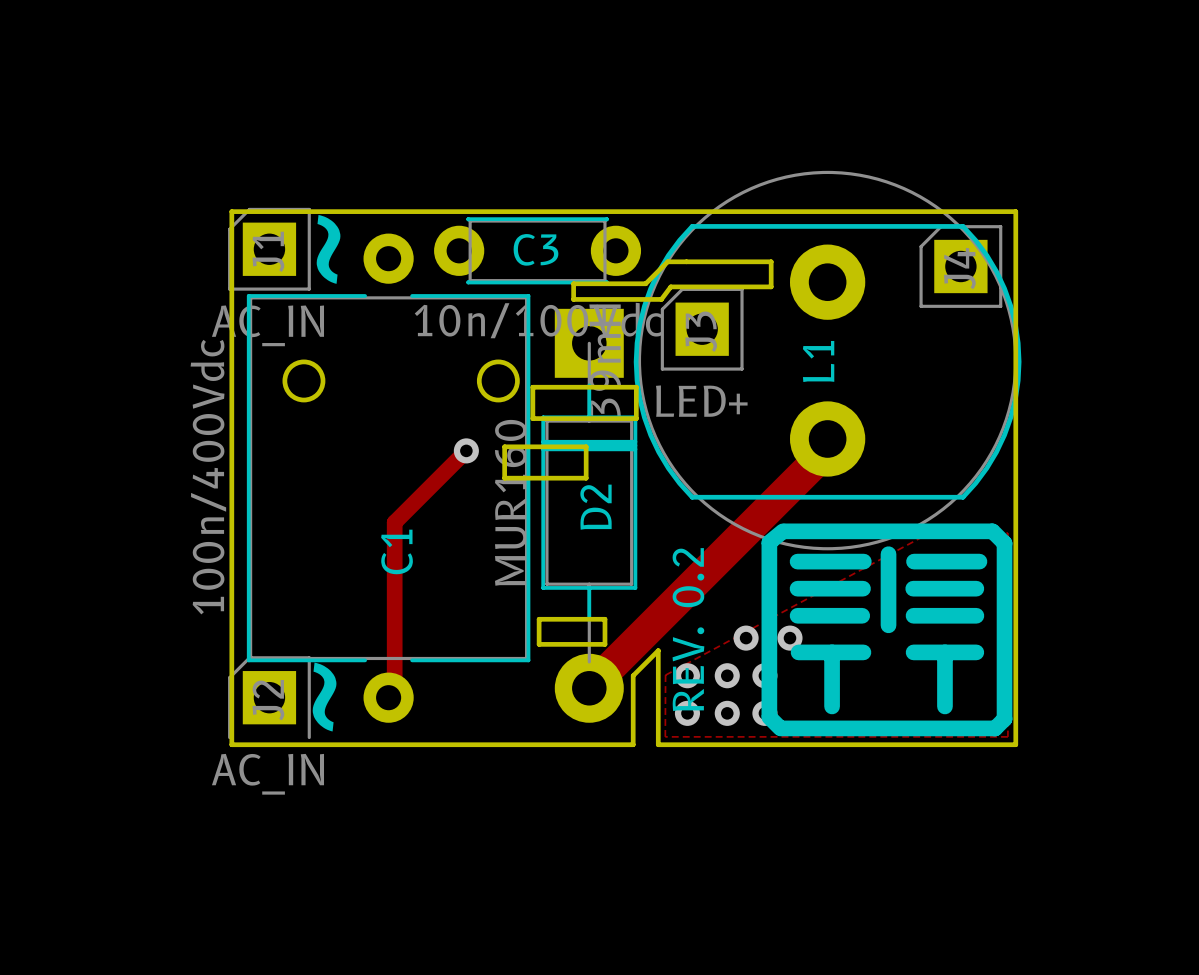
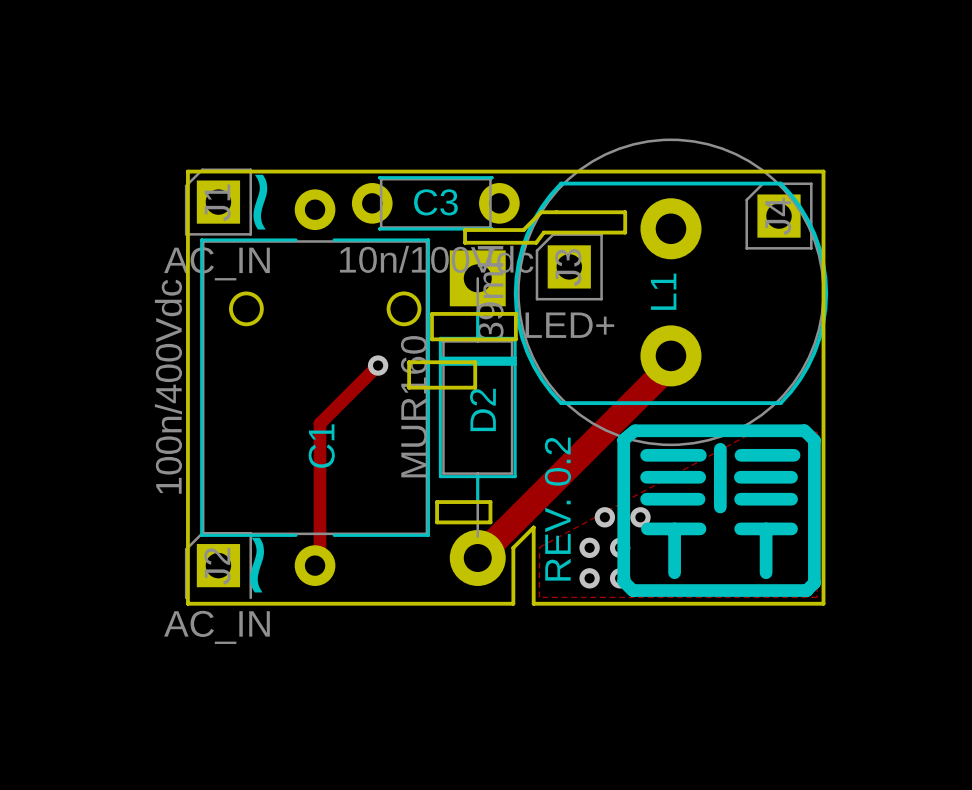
via: (687, 675) -> none
via: (687, 713) -> none

